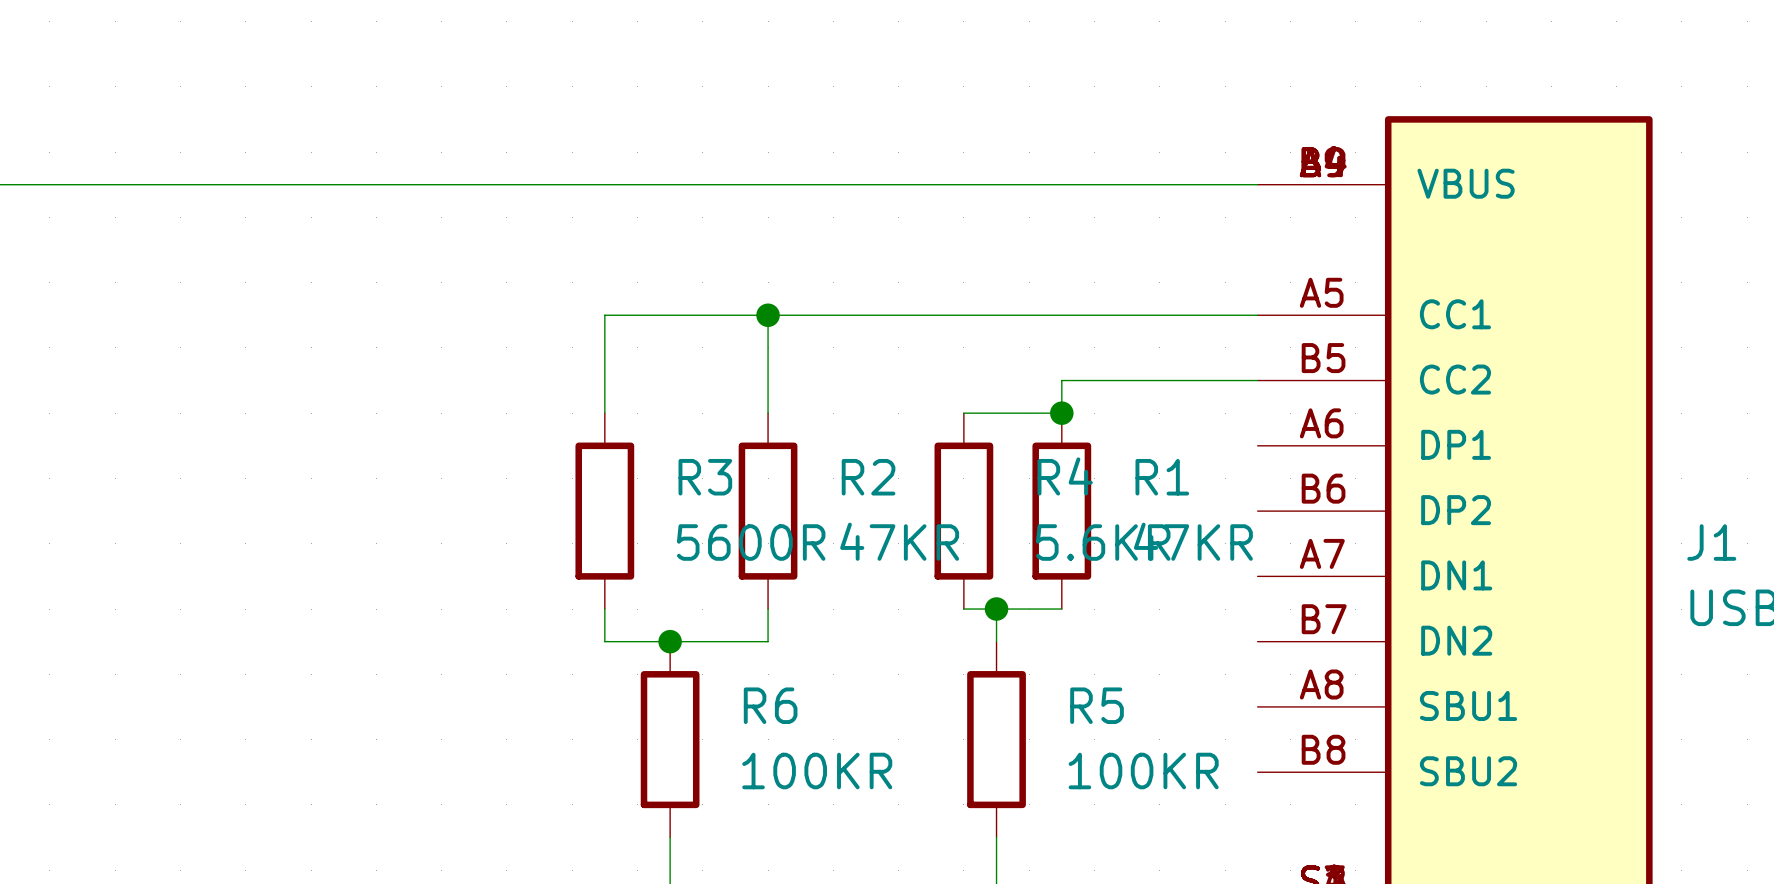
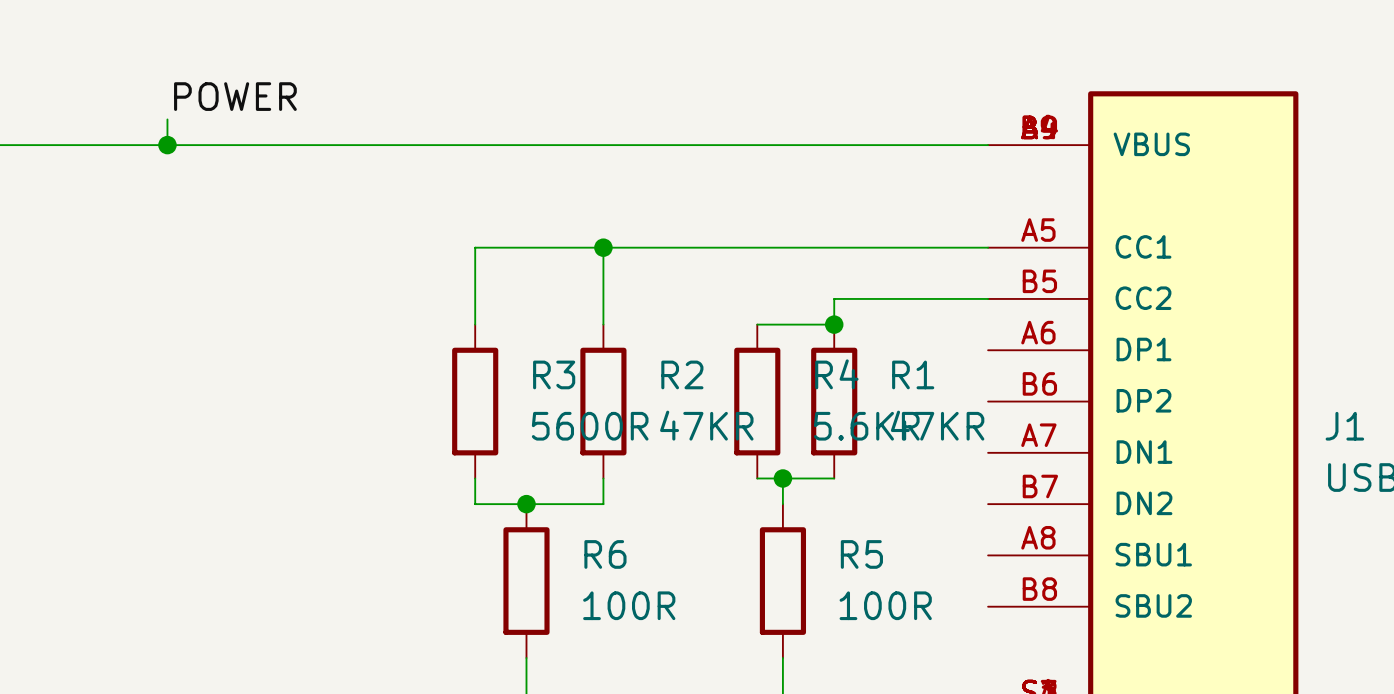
label: none -> POWER (235, 96)
wire: none -> (167, 119) (167, 145)
junction: none -> (167, 145)
R6 value: 100KR (817, 771) -> 100R (629, 605)
R5 value: 100KR (1143, 771) -> 100R (885, 605)

